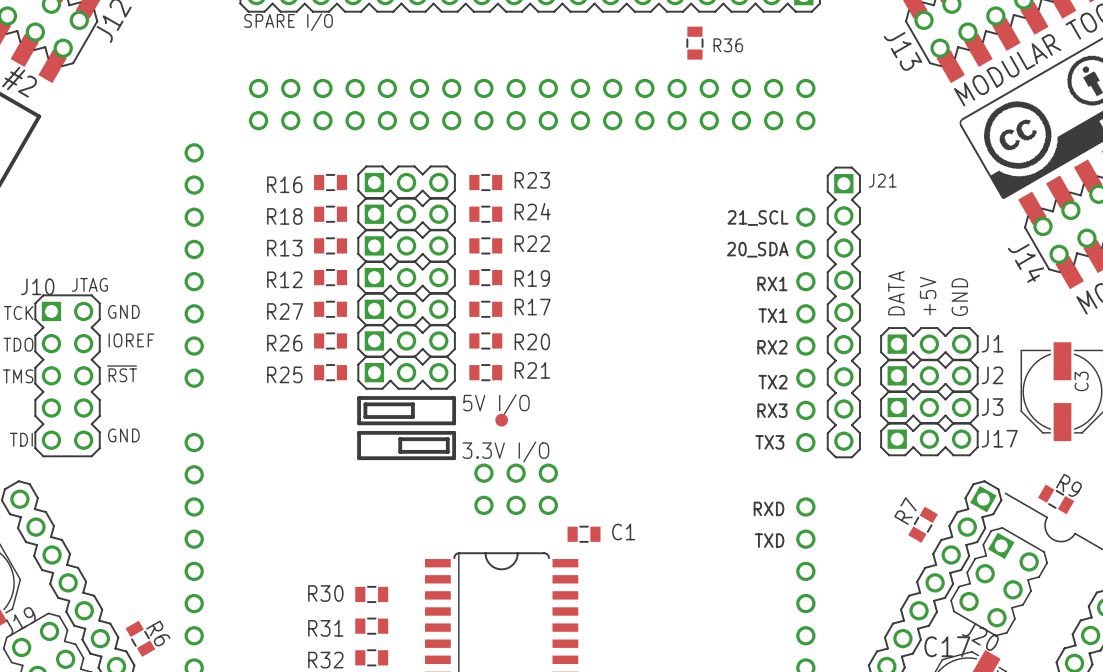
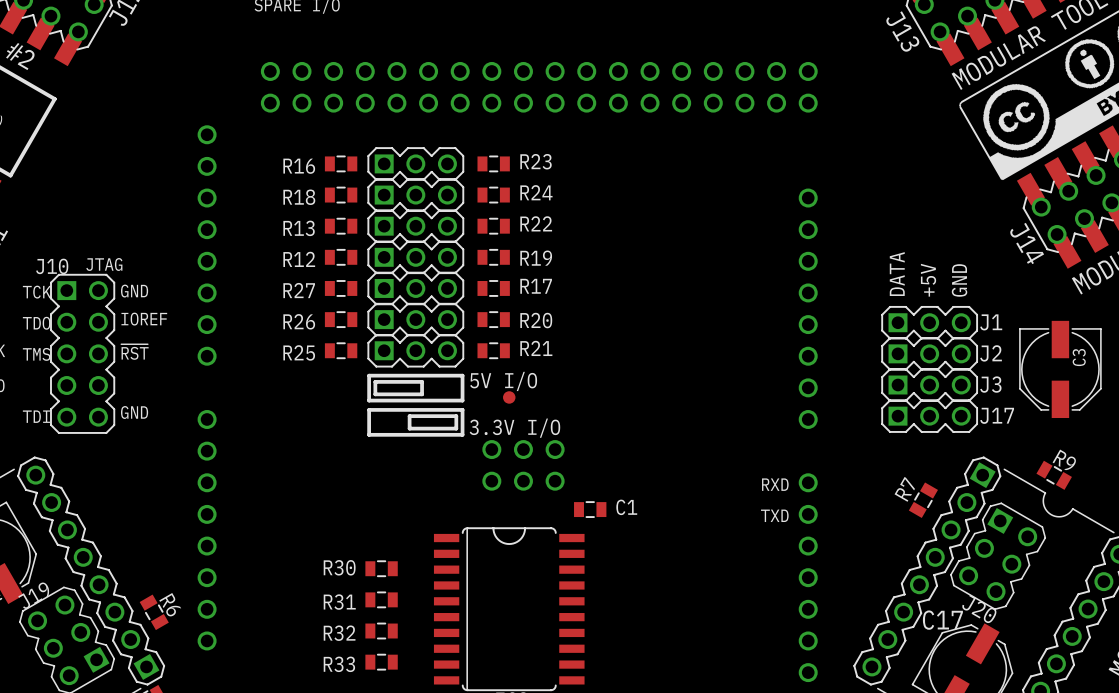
R36: (694, 43) -> none
text: 21_SCL (758, 218) -> none
text: 20_SDA (757, 249) -> none
text: RX1 (772, 283) -> none
J21: (843, 312) -> none
text: TX1 (772, 315) -> none
text: RX2 (772, 347) -> none
text: TX2 (772, 382) -> none
text: RX3 (772, 410) -> none
text: TX3 (769, 442) -> none

